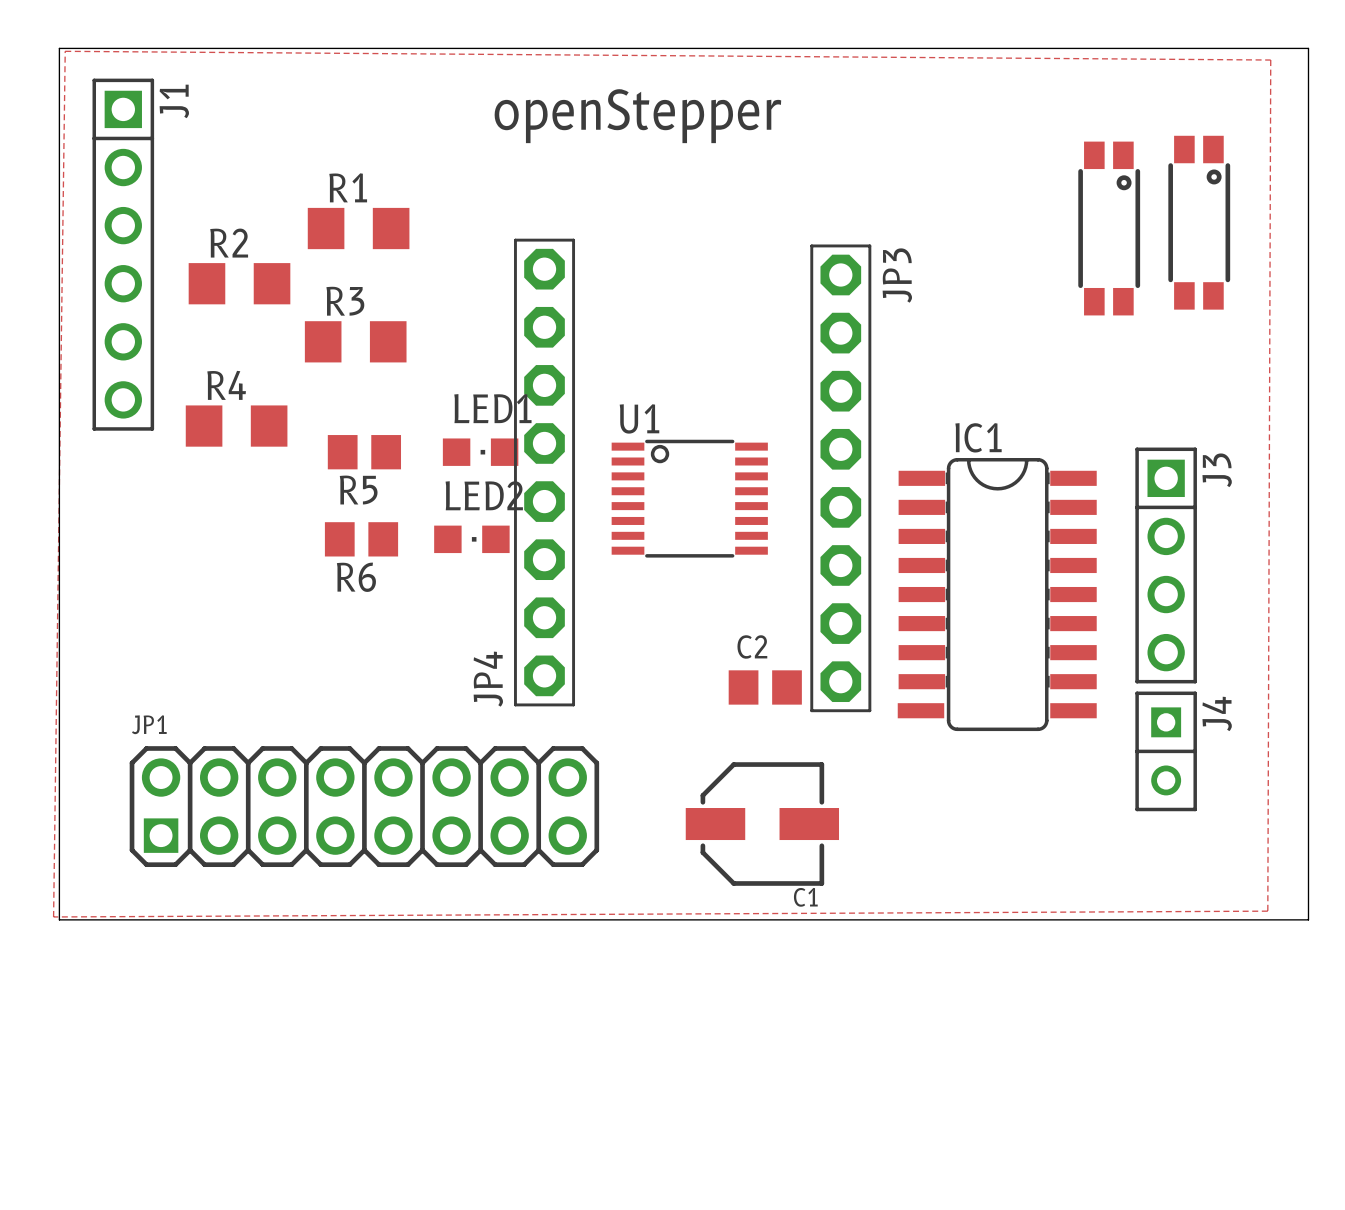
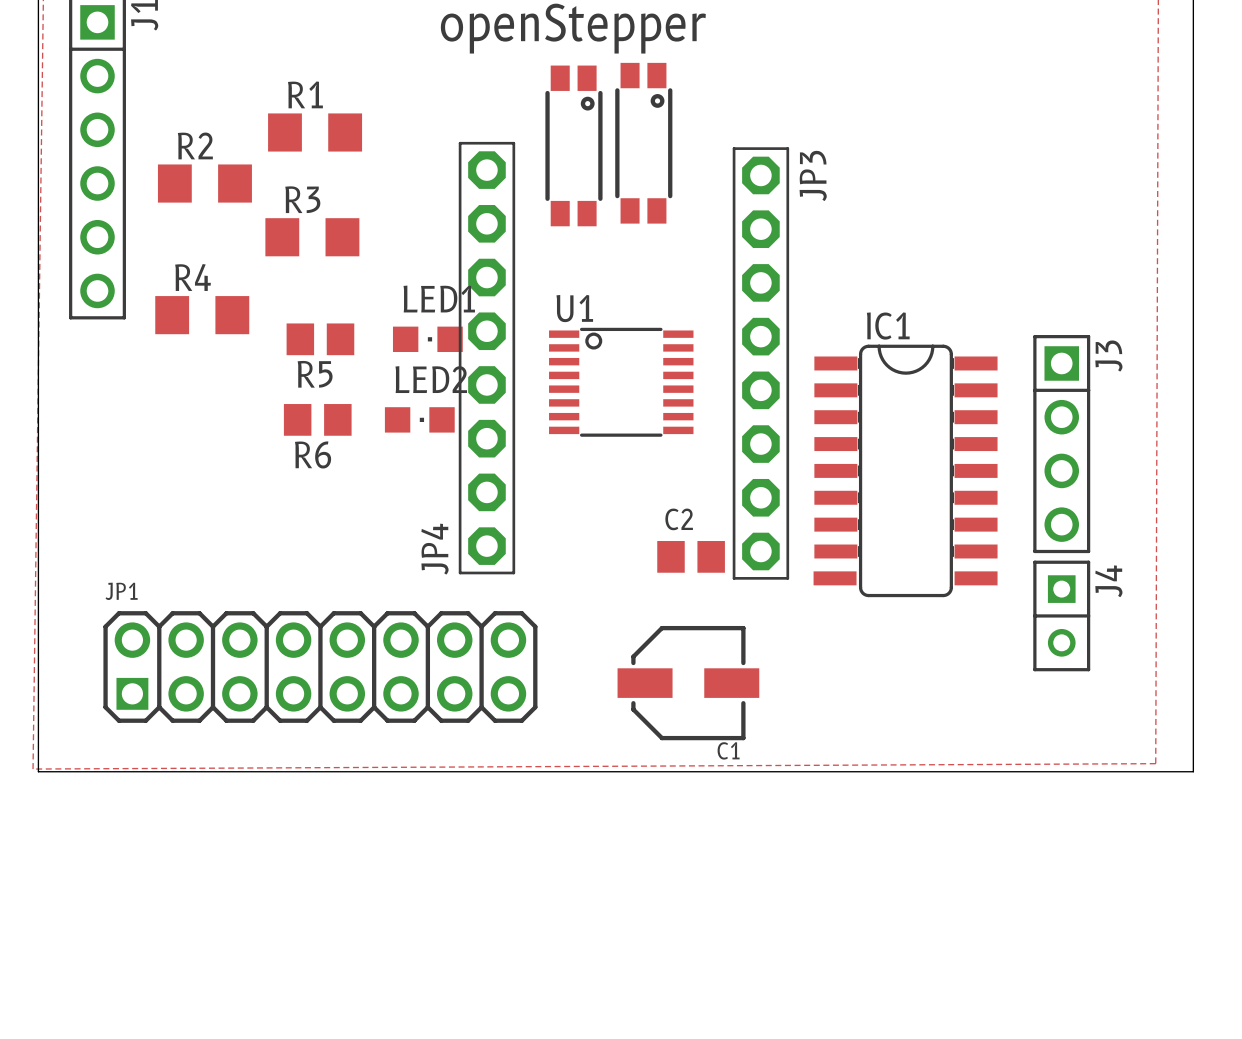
part: (1199, 222) -> none
part: (1109, 228) -> none
part: none -> (643, 143)
part: none -> (573, 145)

